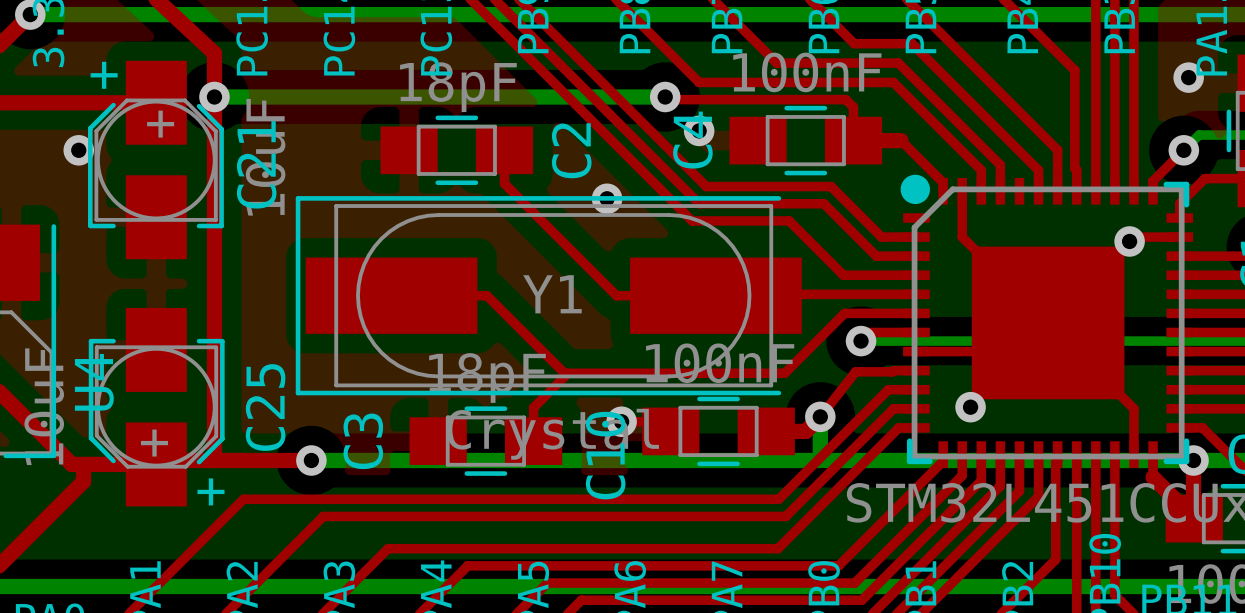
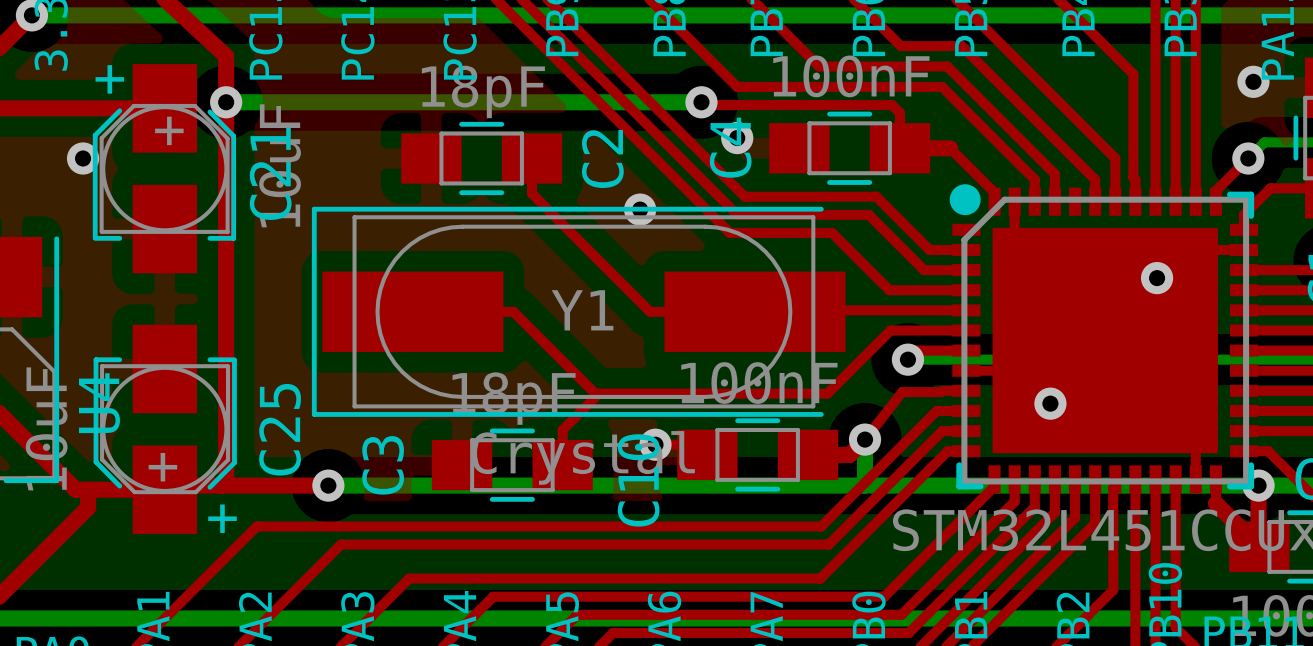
part footprint: [900, 174, 1194, 468] -> [949, 184, 1259, 494]
via position: (1129, 241) -> (1157, 278)
via position: (970, 407) -> (1050, 403)

